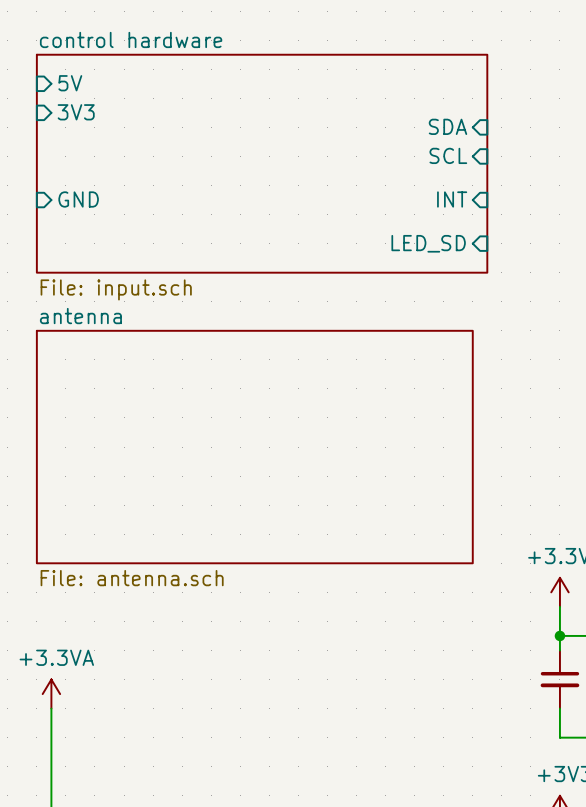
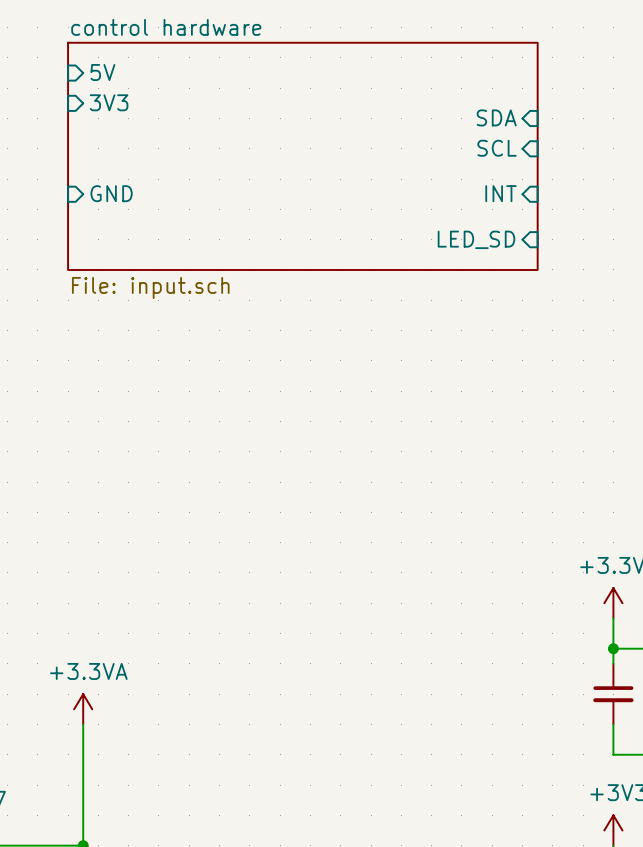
sheet antenna: File: antenna.sch (254, 447) -> none

